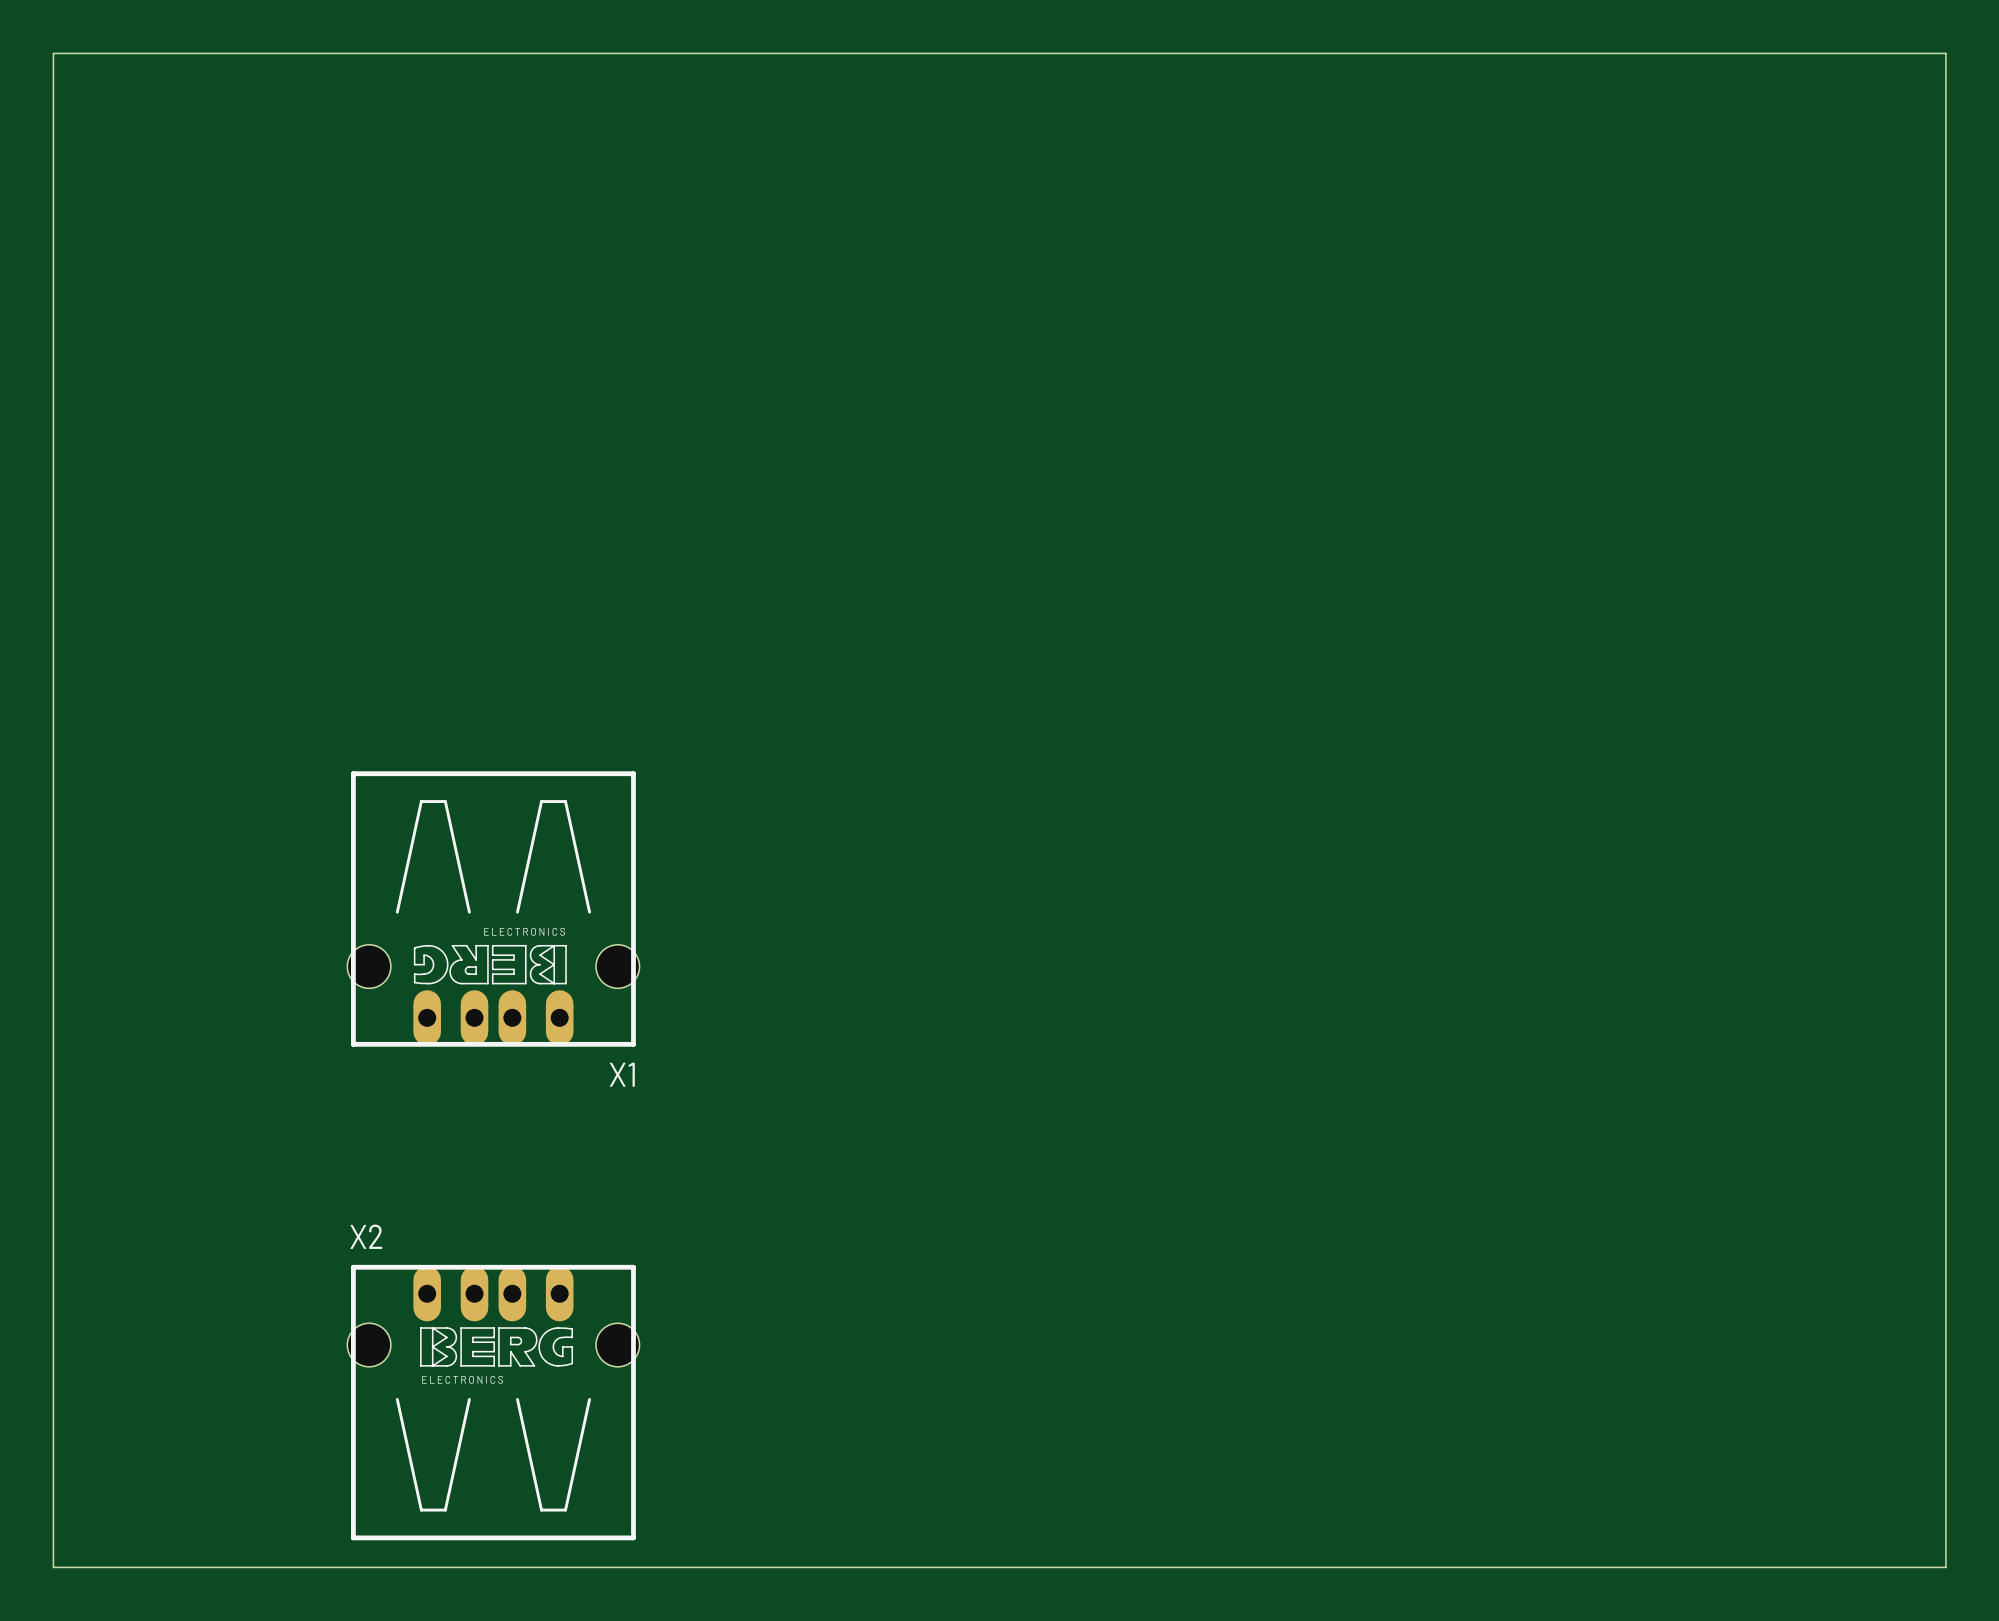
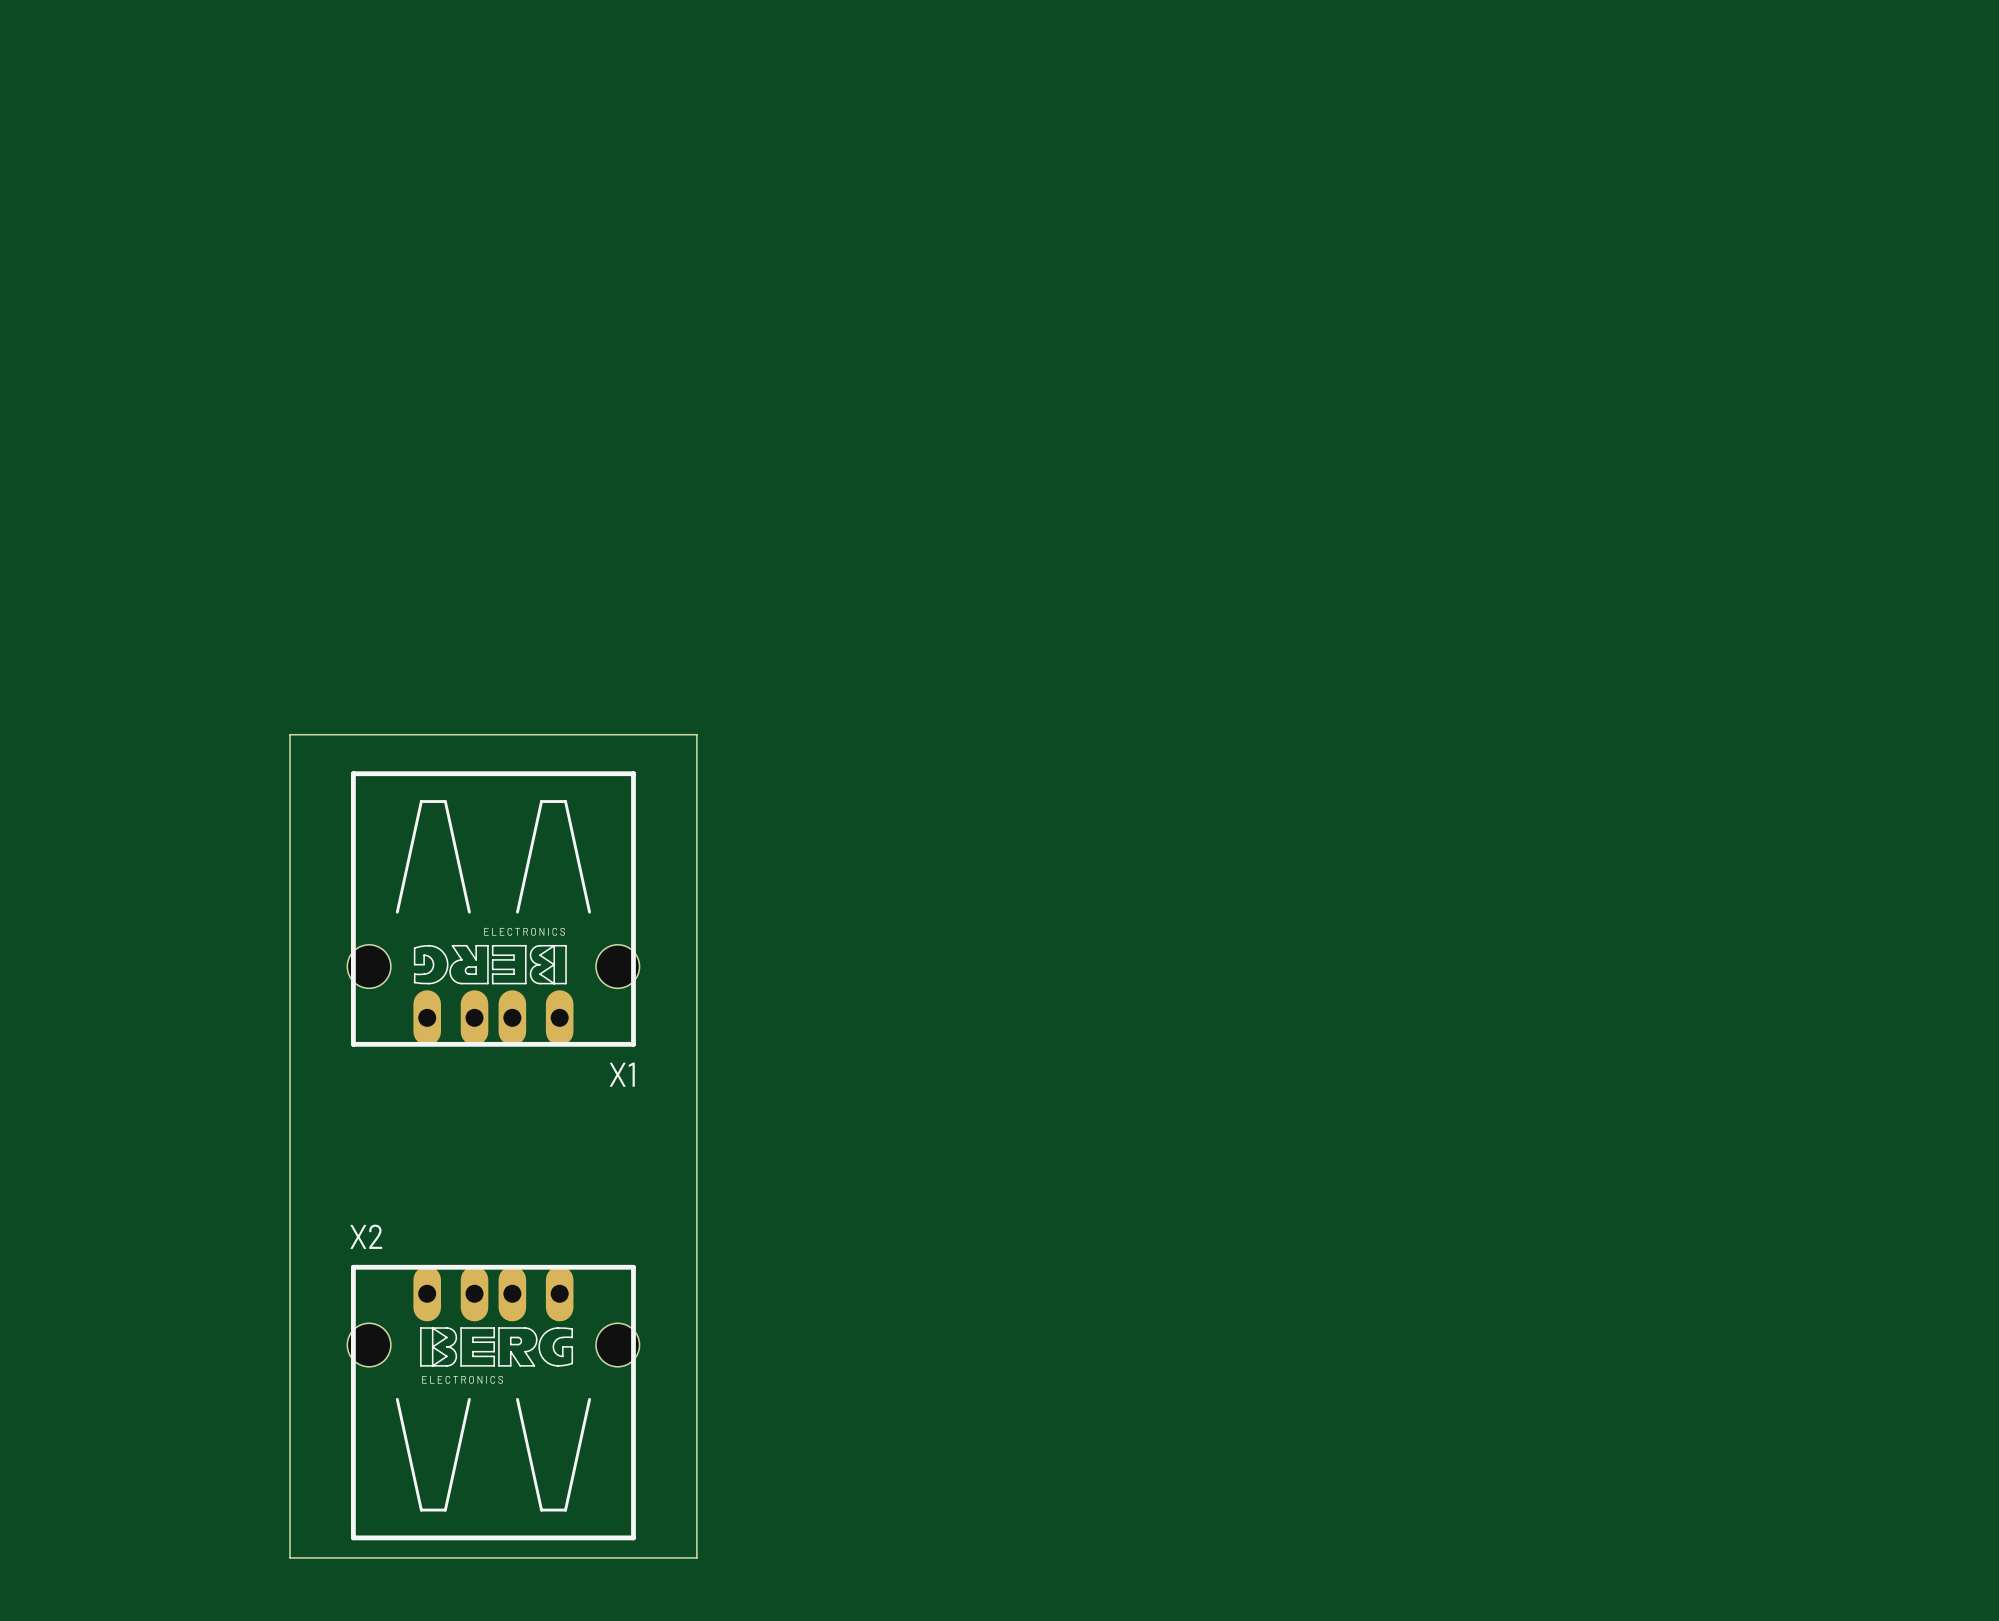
board edge: (53, 53) (1945, 53) (1945, 1567) (53, 1567) (53, 53) -> none
board edge: none -> (290, 734) (696, 734) (696, 1557) (290, 1557) (290, 734)

